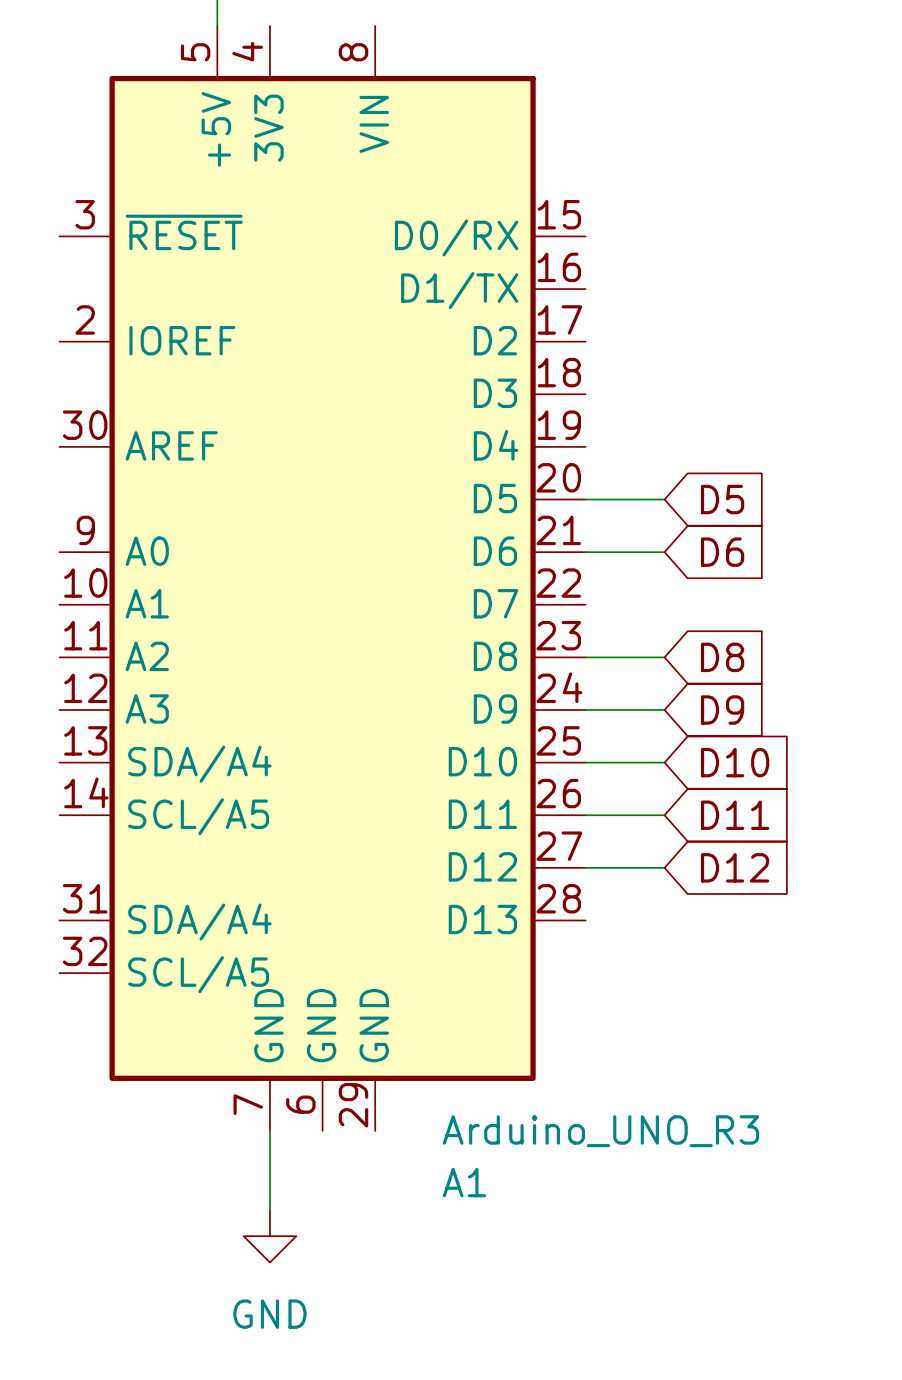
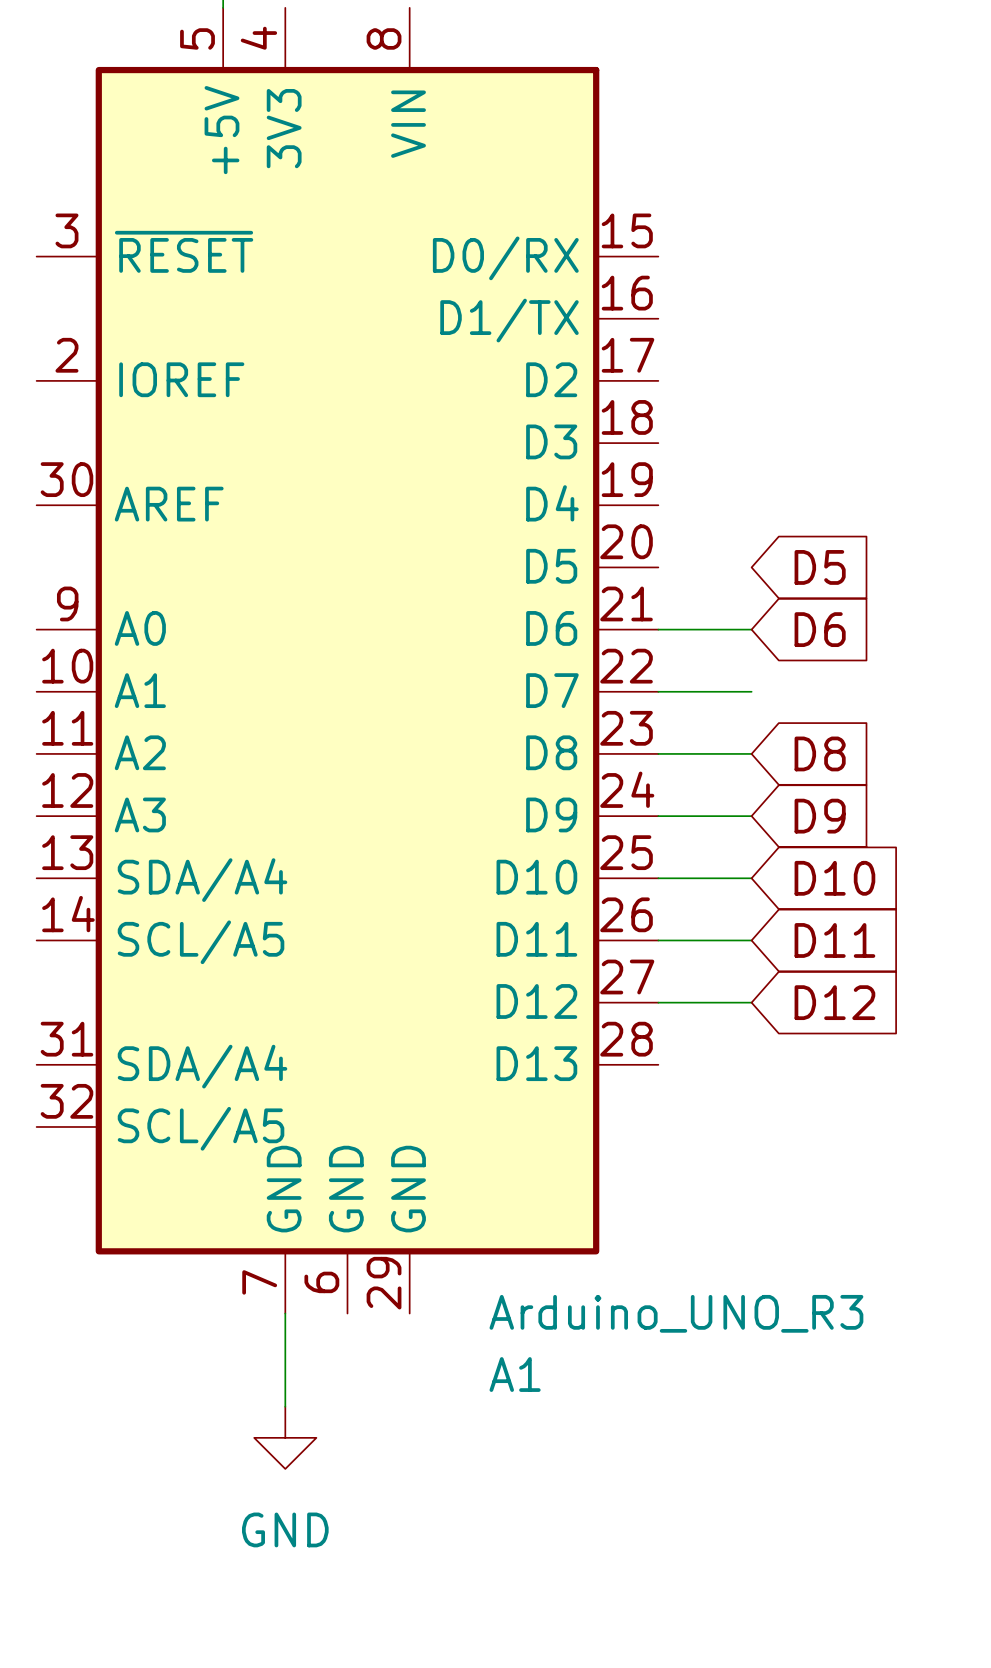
wire: (585, 499) (664, 499) -> (658, 691) (751, 691)

